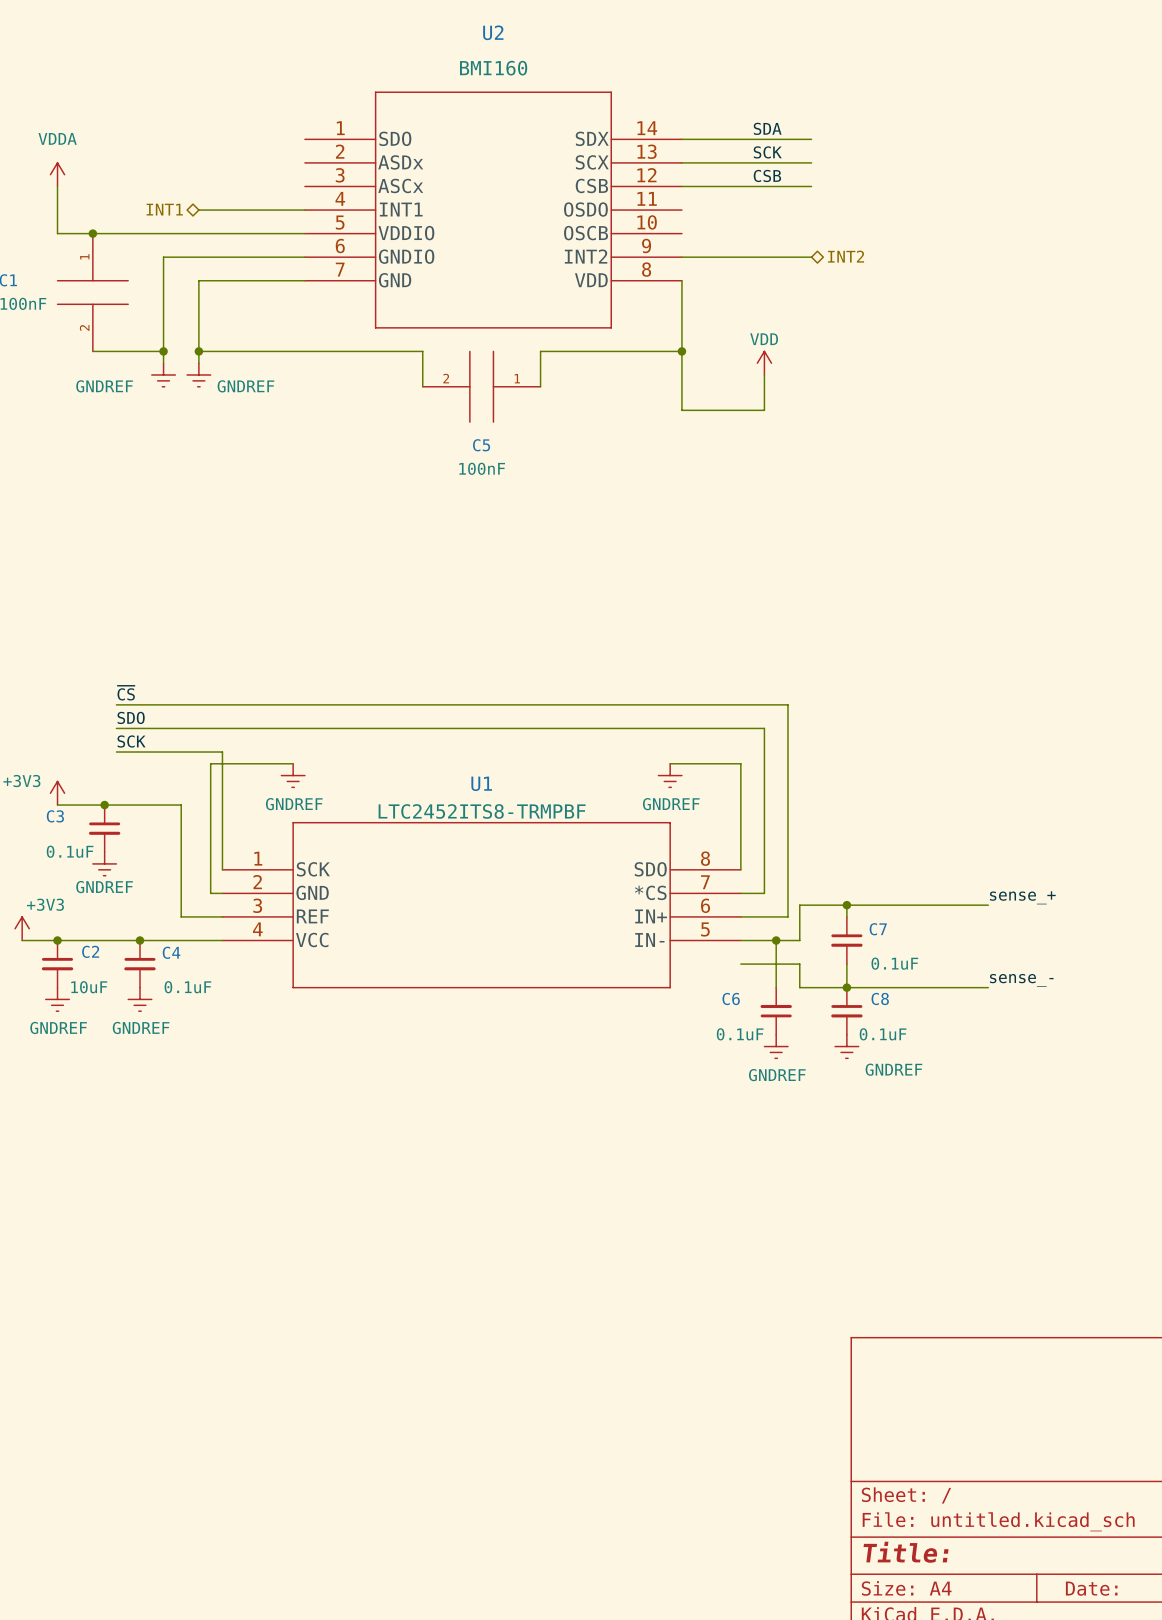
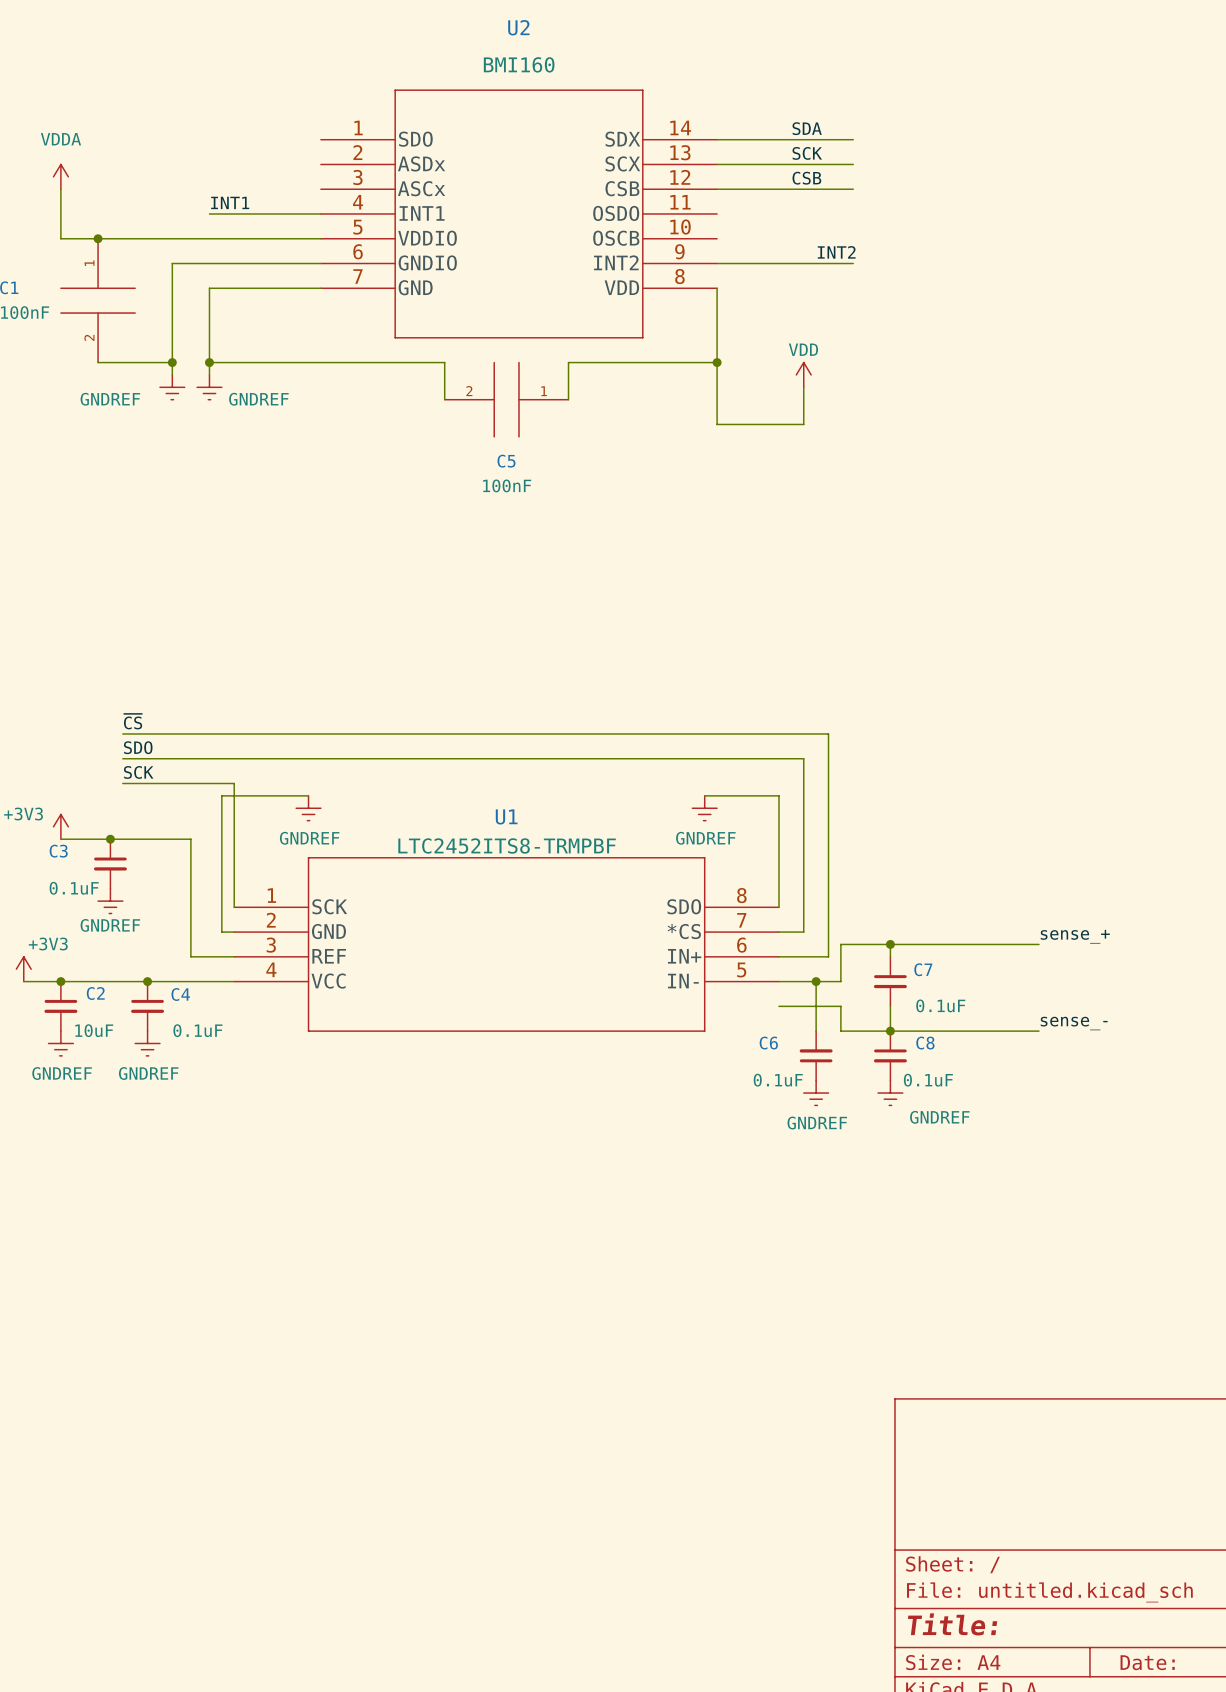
label: none -> INT1 (230, 202)
hierarchical label: INT1 (164, 209) -> none
label: none -> INT2 (836, 252)
hierarchical label: INT2 (846, 256) -> none

